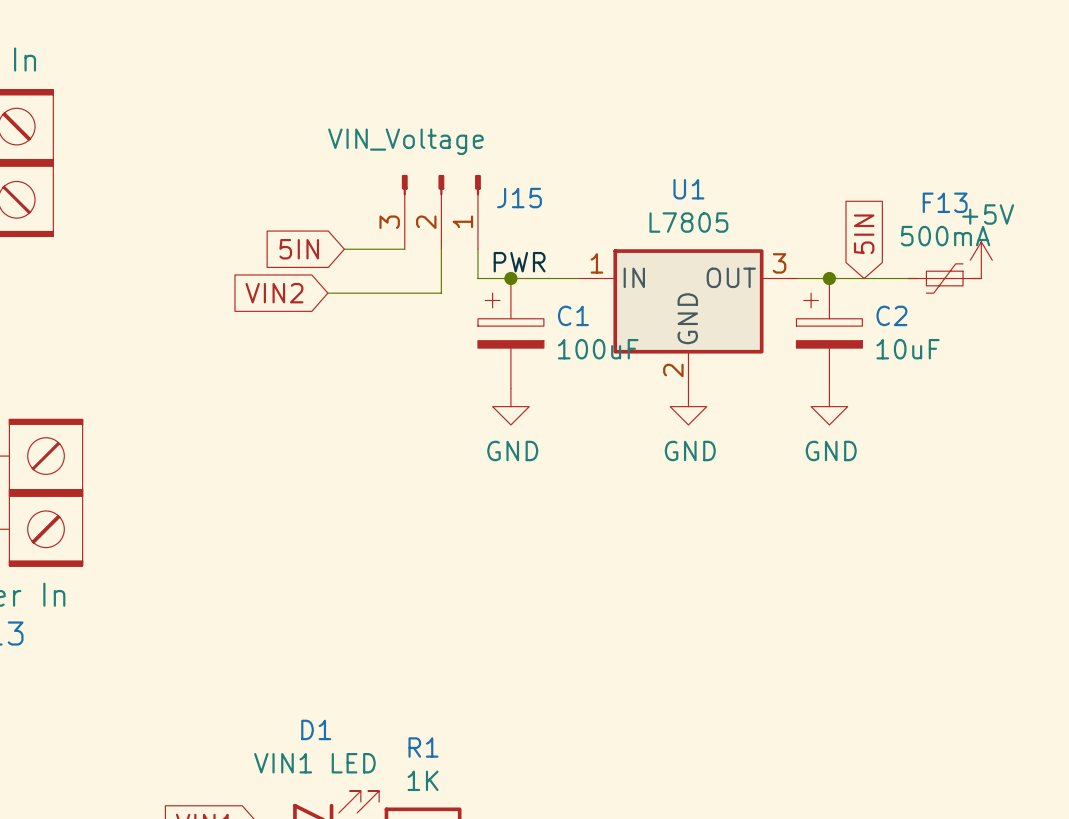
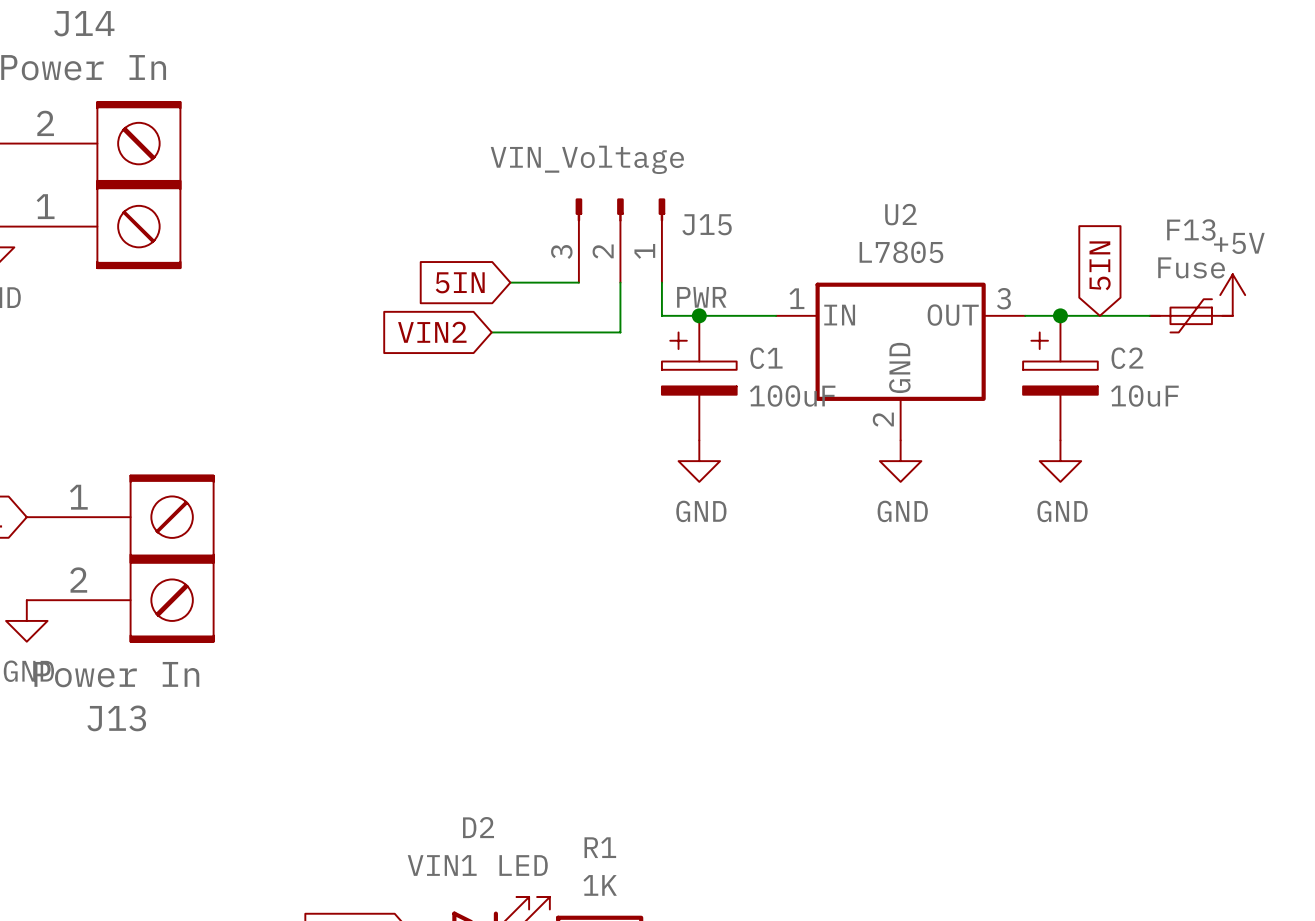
U1 name: U1 (688, 189) -> U2 (900, 214)
F13 value: 500mA (945, 236) -> Fuse (1191, 267)
D1 name: D1 (316, 729) -> D2 (478, 827)

